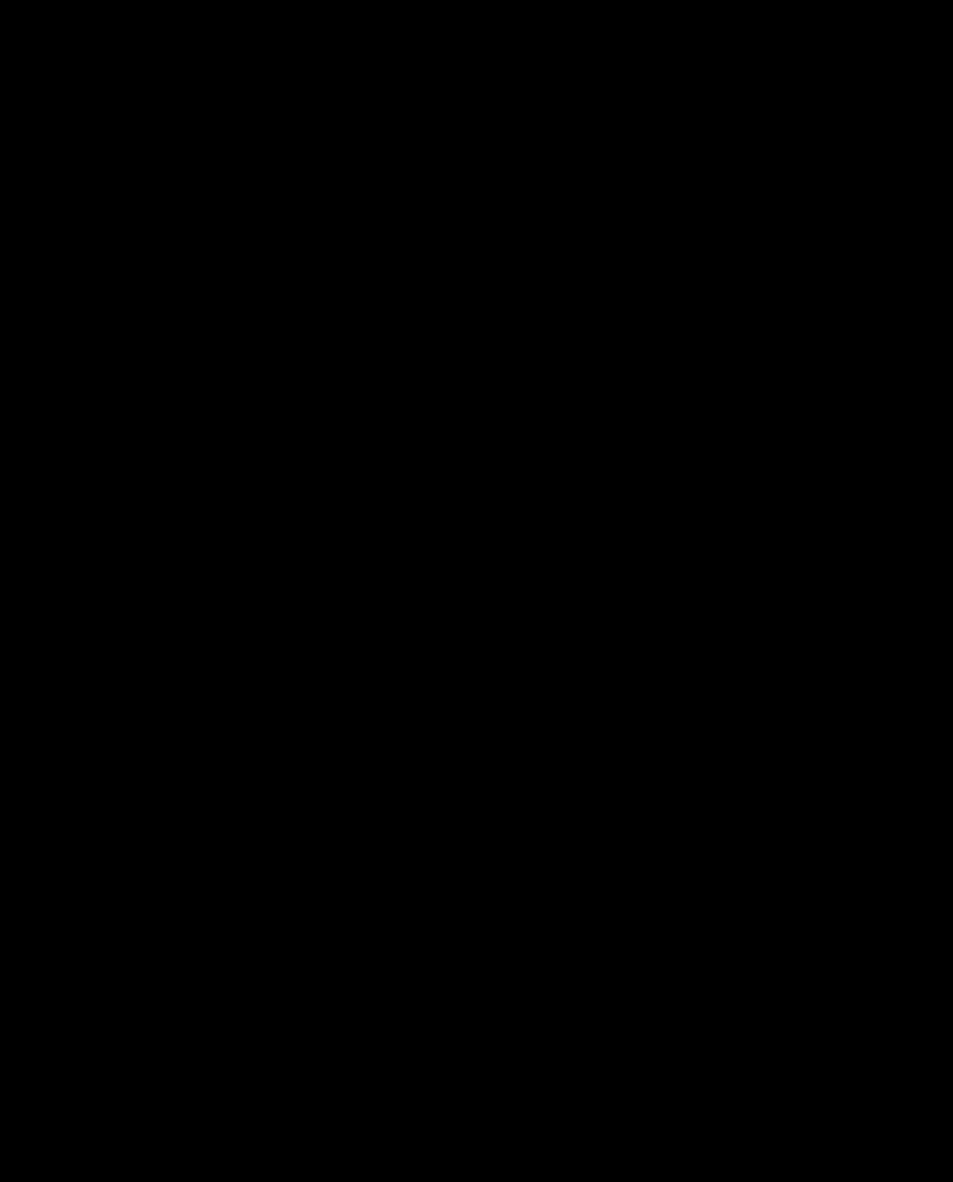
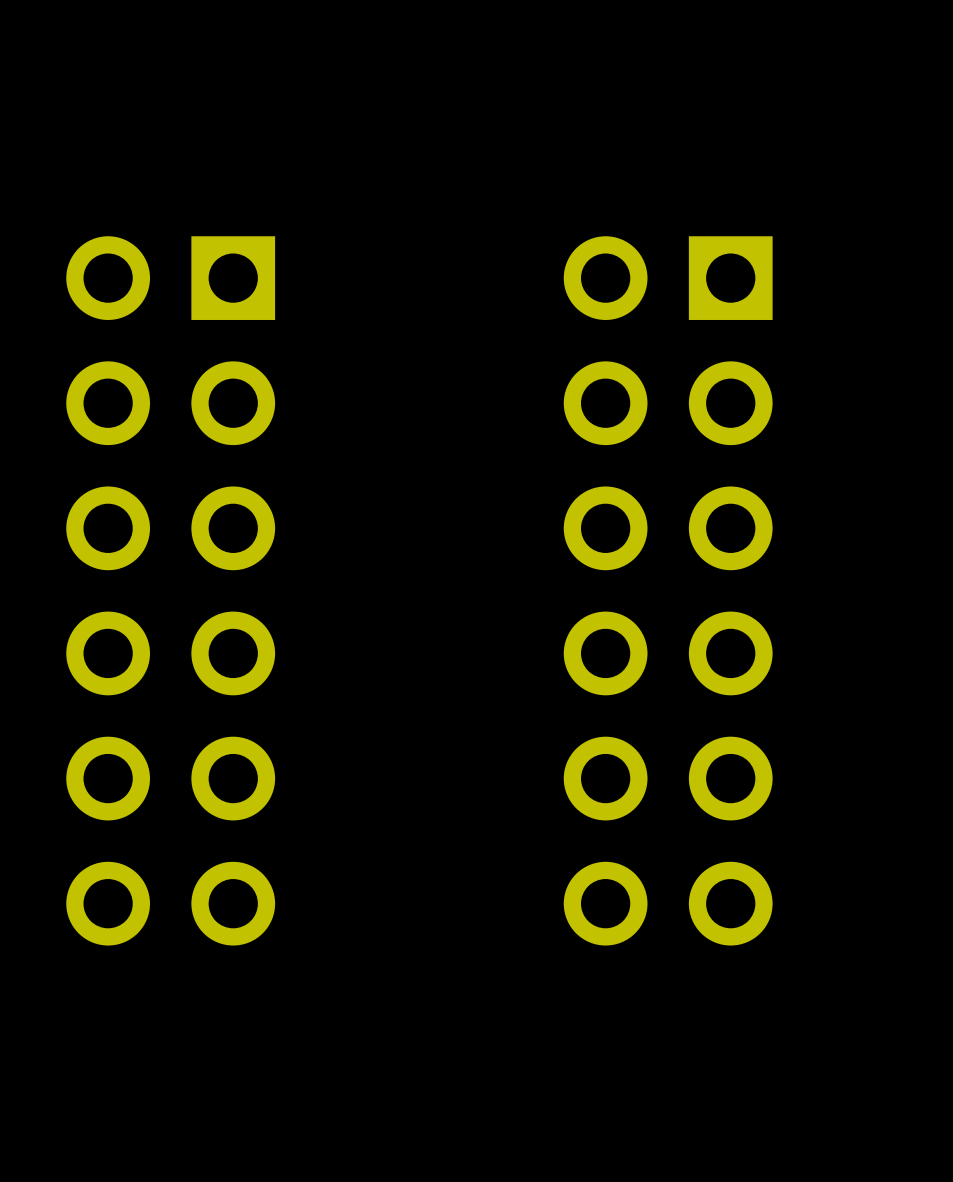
part: none -> (170, 590)
part: none -> (668, 590)

